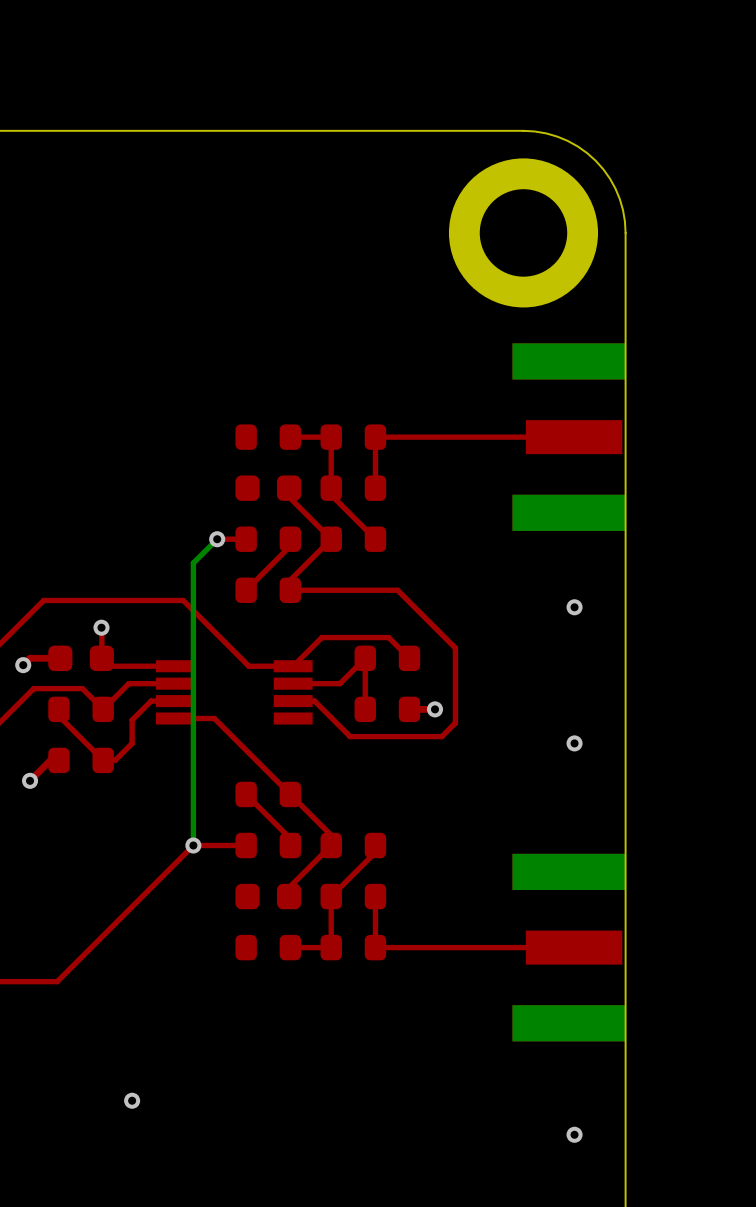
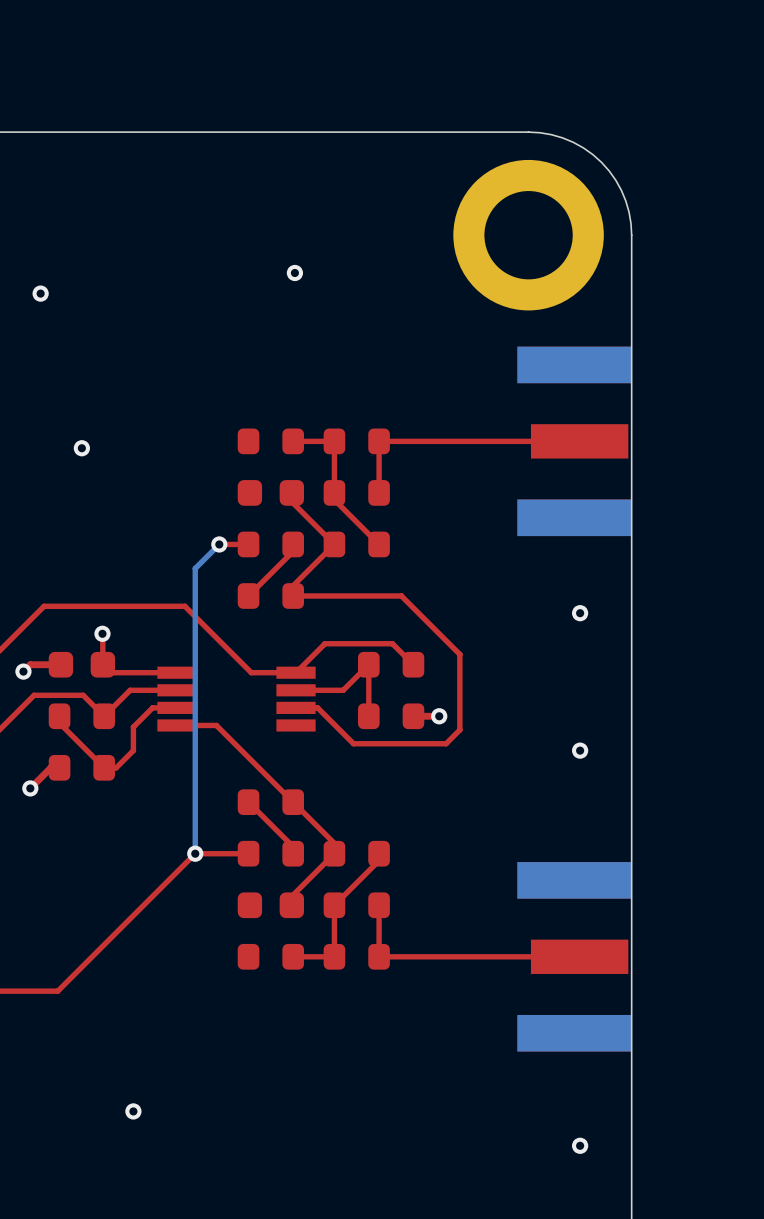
via: none -> (294, 272)
via: none -> (40, 293)
via: none -> (81, 448)

